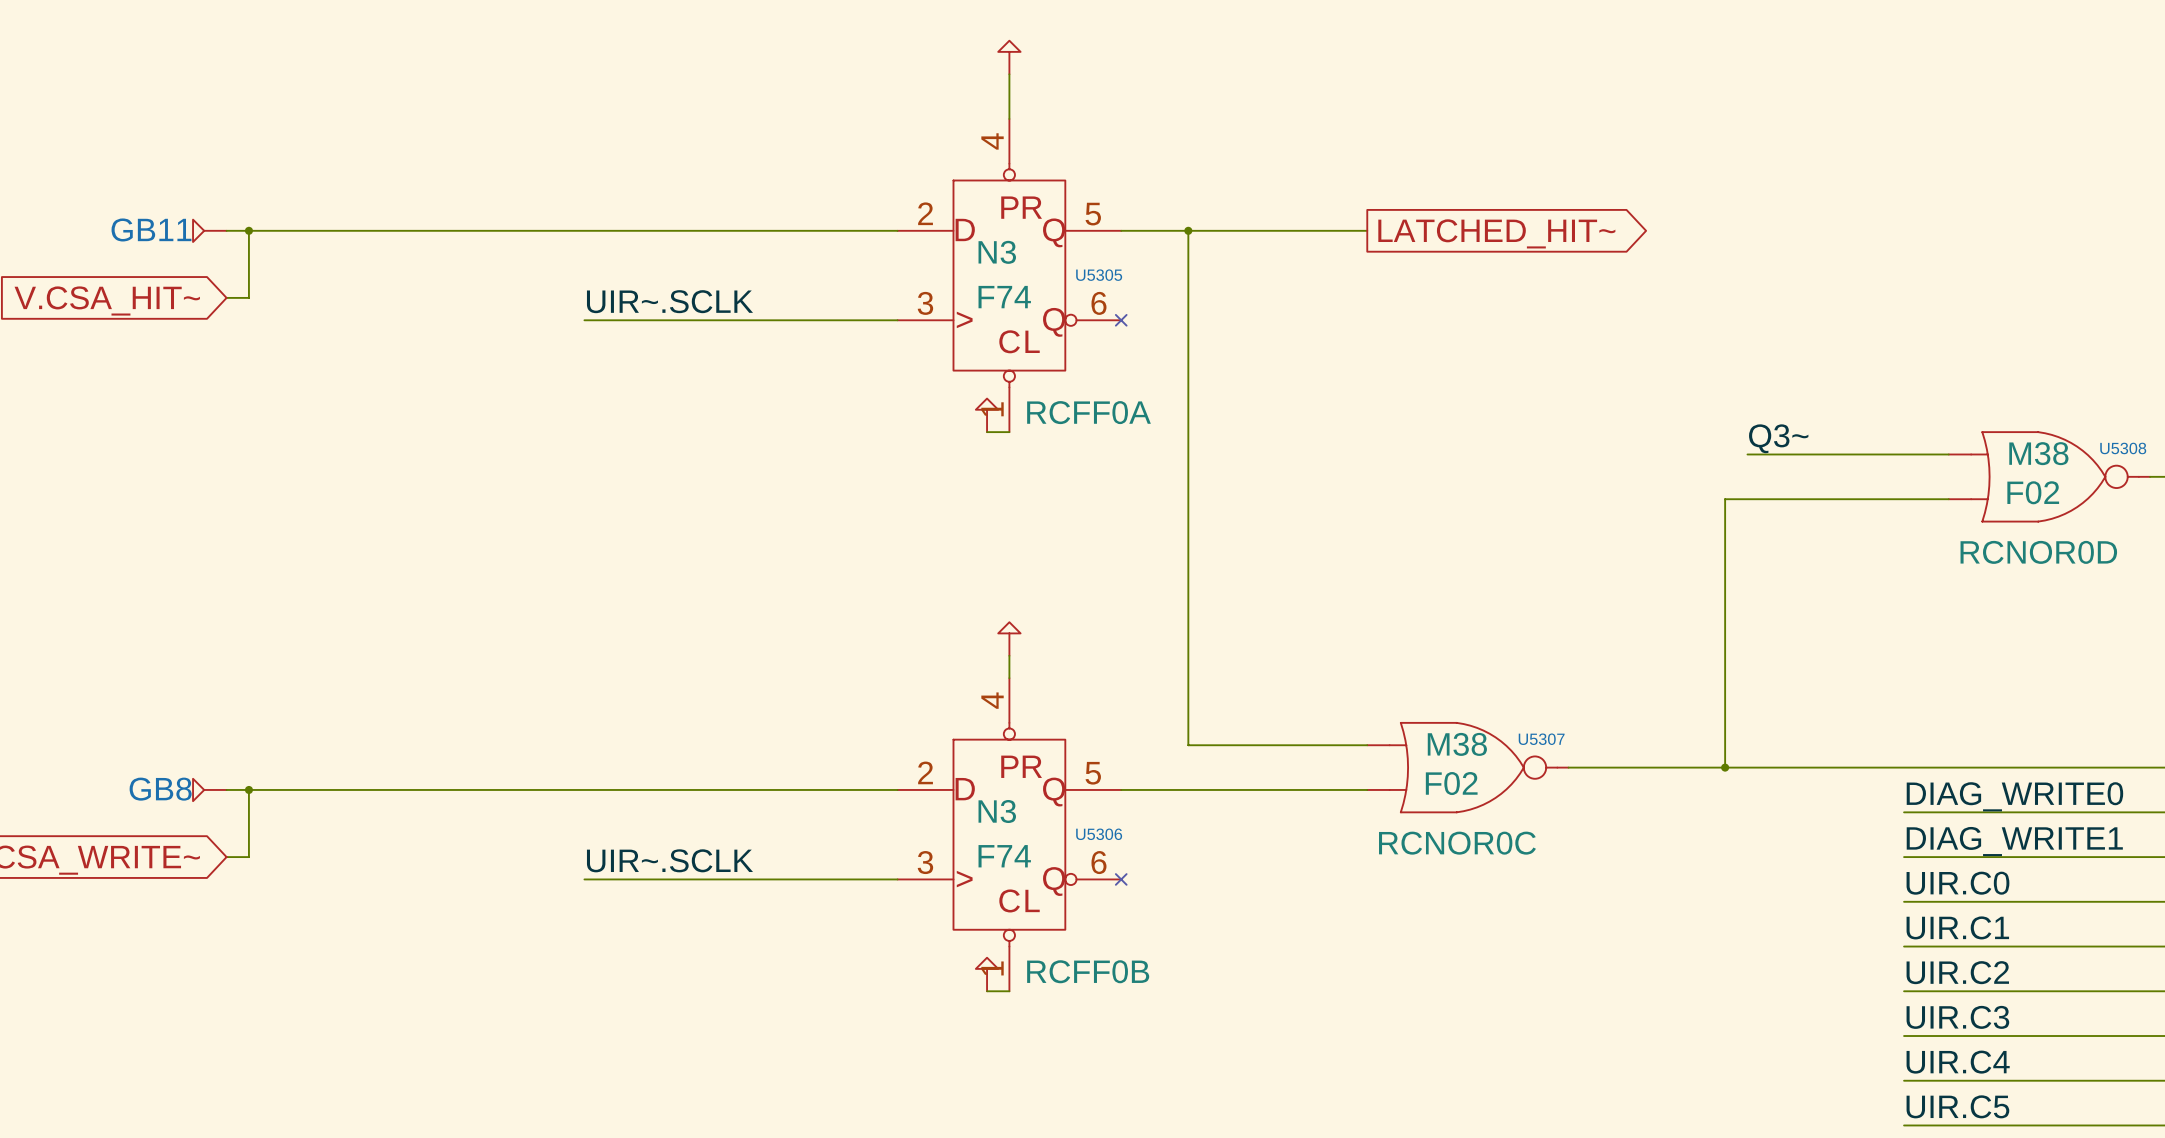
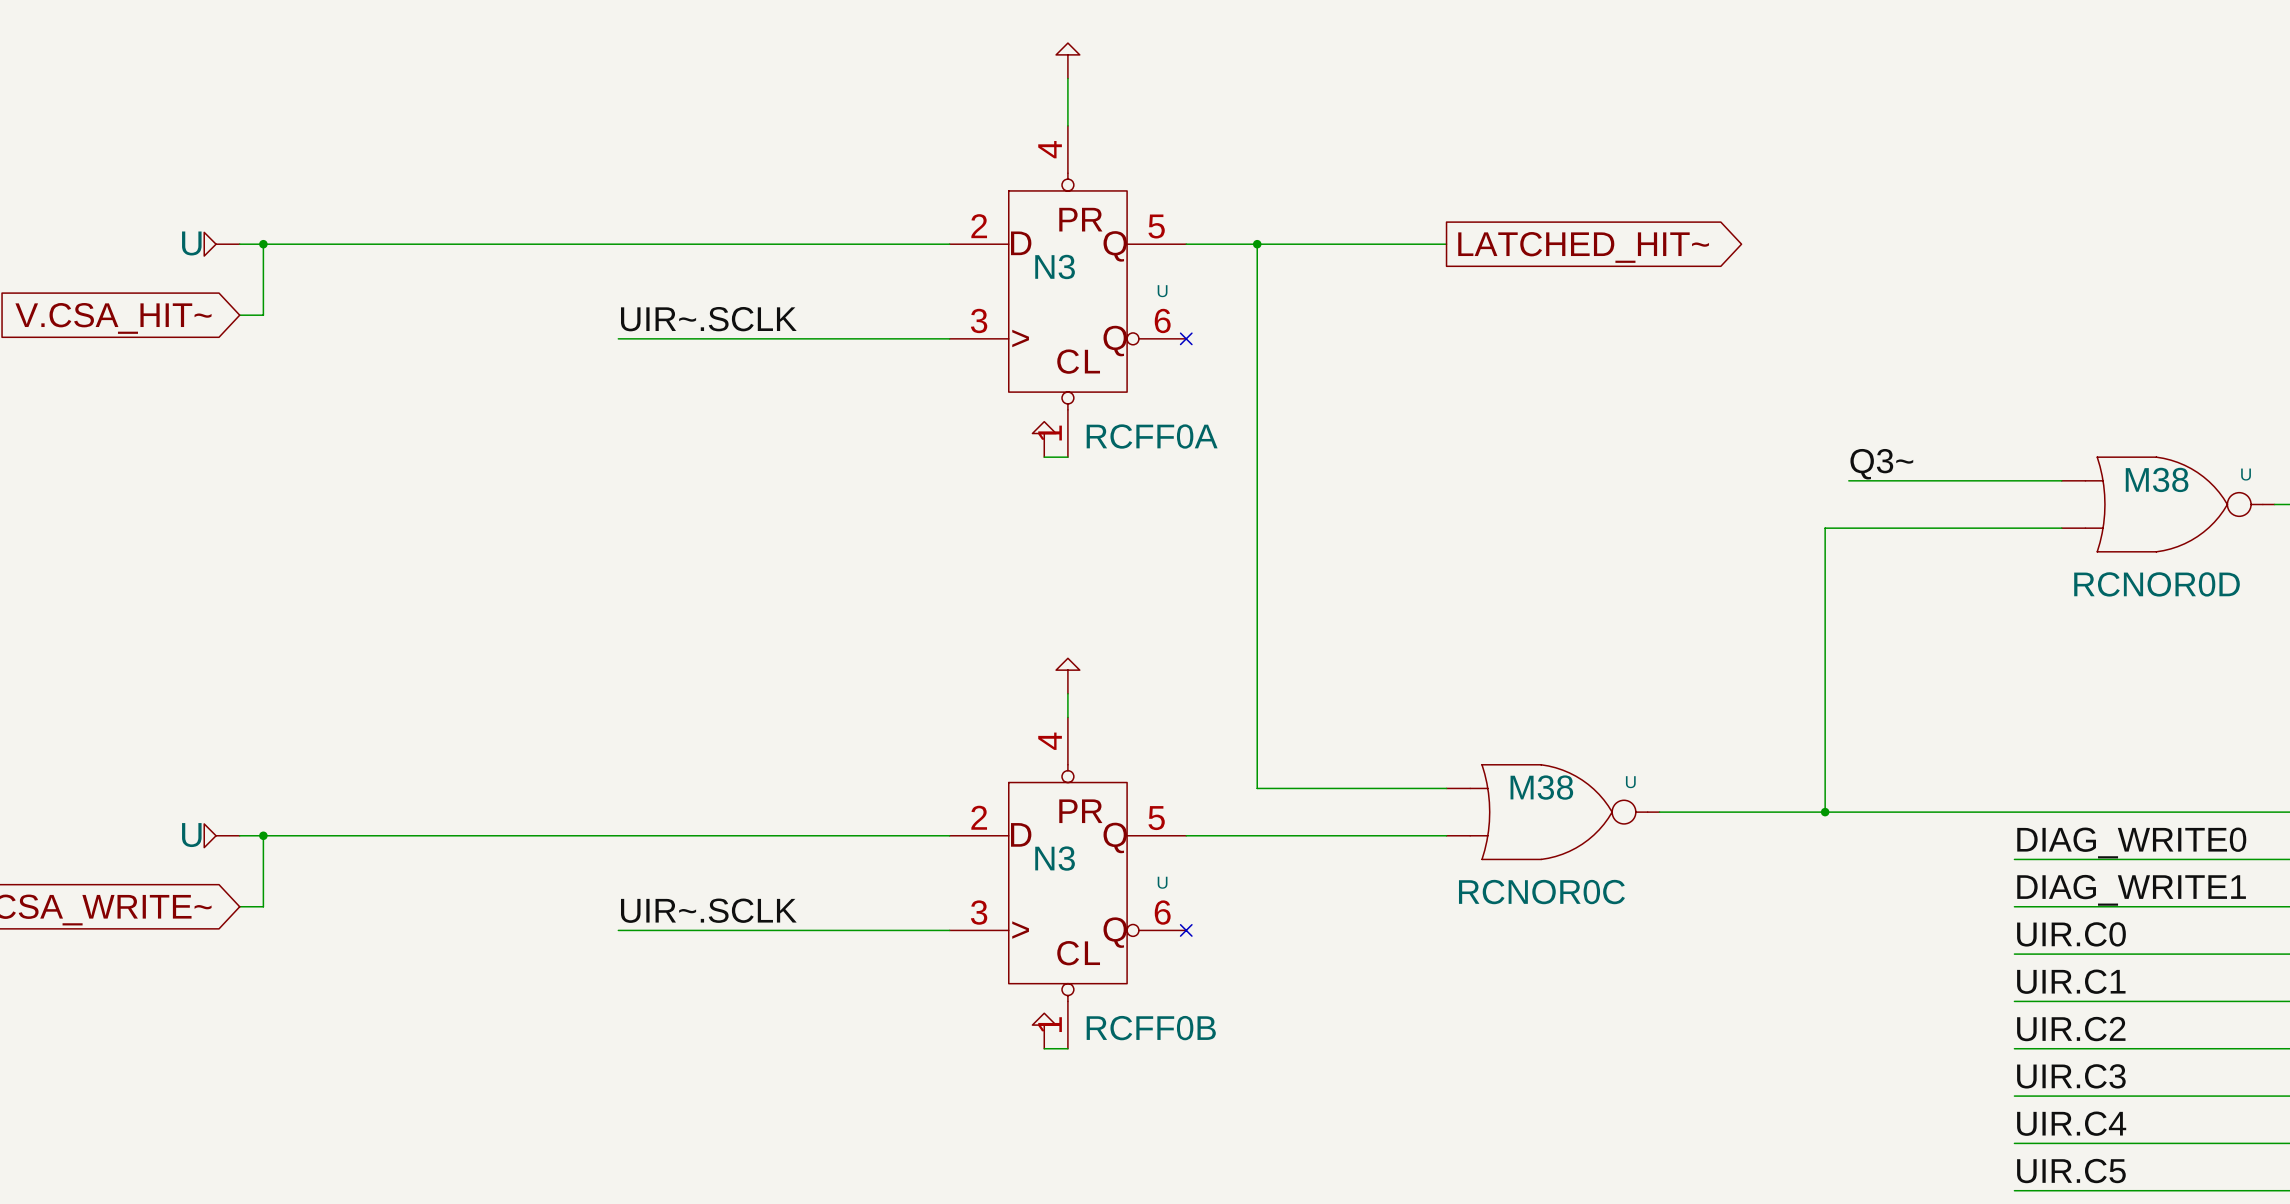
GB11 name: GB11 (151, 229) -> U (191, 243)
U5305 name: U5305 (1099, 275) -> U (1162, 291)
U5305 value: F74 (1004, 297) -> none
U5308 name: U5308 (2123, 448) -> U (2246, 474)
U5308 value: F02 (2033, 492) -> none
U5307 name: U5307 (1541, 739) -> U (1630, 782)
U5307 value: F02 (1451, 783) -> none
GB8 name: GB8 (160, 789) -> U (191, 835)
U5306 name: U5306 (1099, 834) -> U (1162, 882)
U5306 value: F74 (1004, 856) -> none

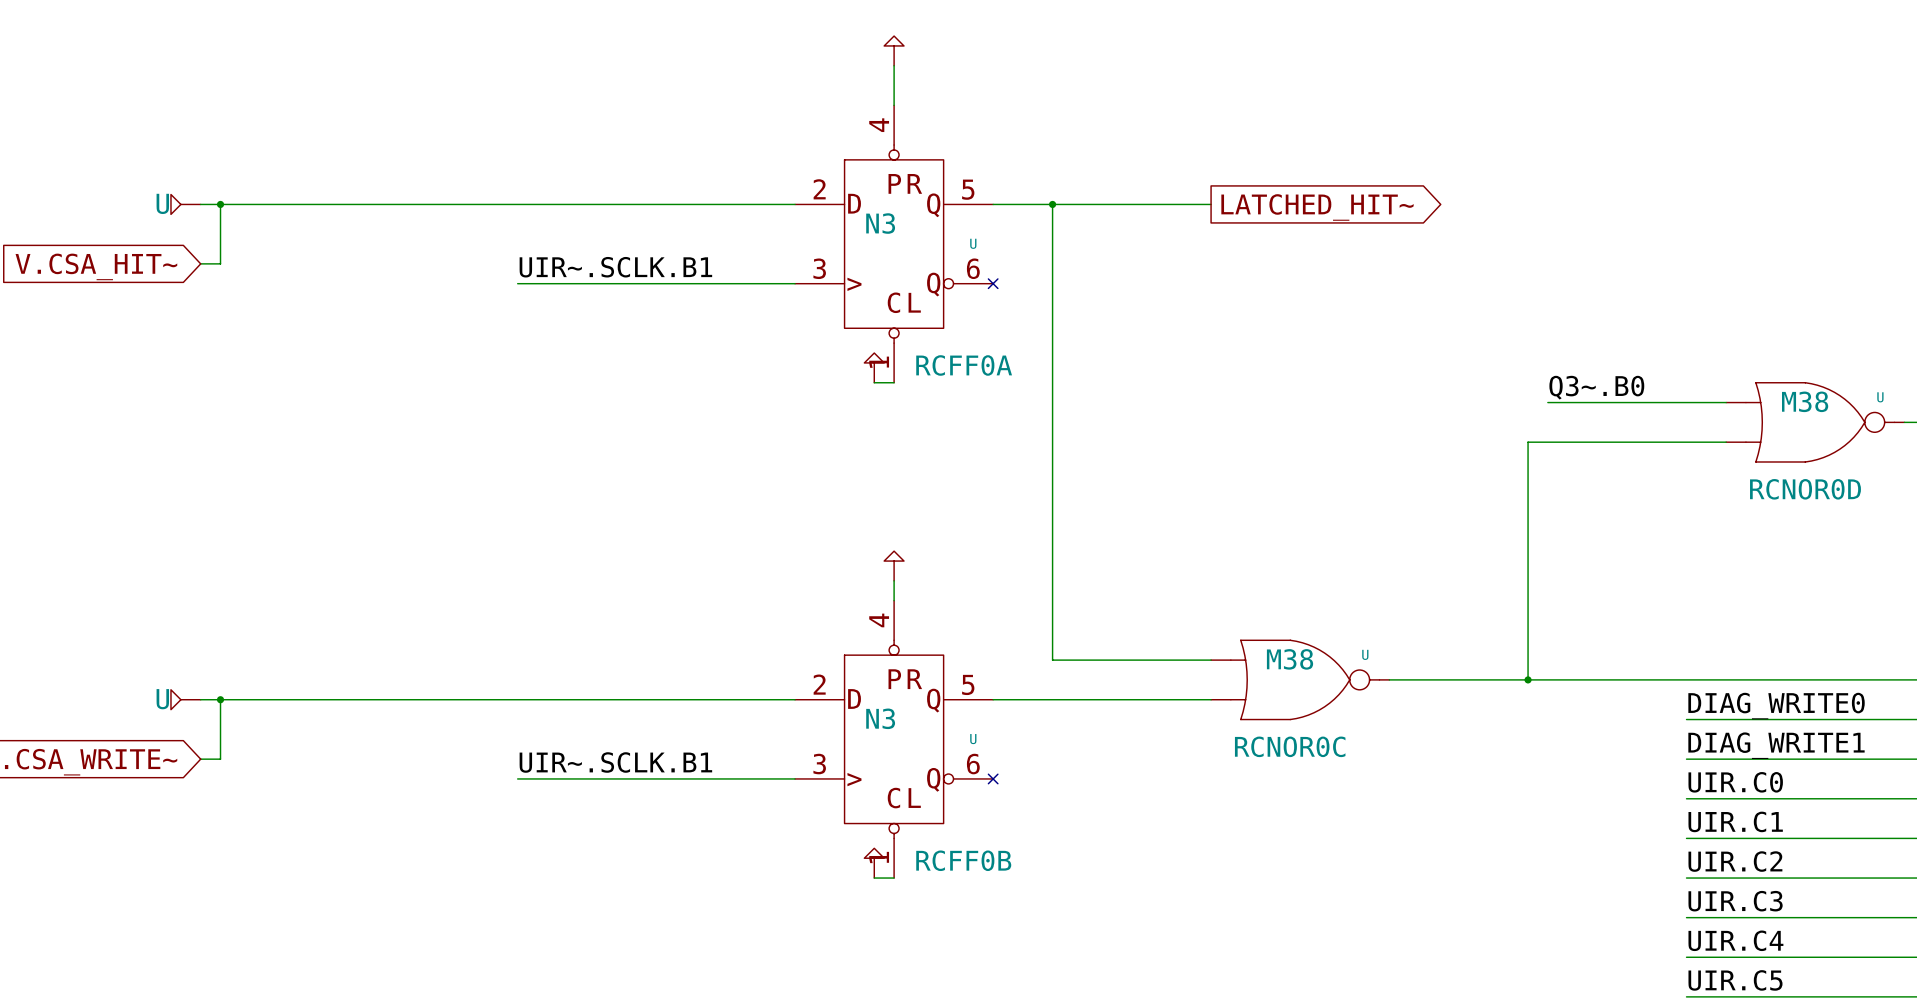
label: UIR~.SCLK (708, 319) -> UIR~.SCLK.B1 (615, 267)
label: Q3~ (1881, 464) -> Q3~.B0 (1596, 387)
label: UIR~.SCLK (708, 910) -> UIR~.SCLK.B1 (615, 762)

